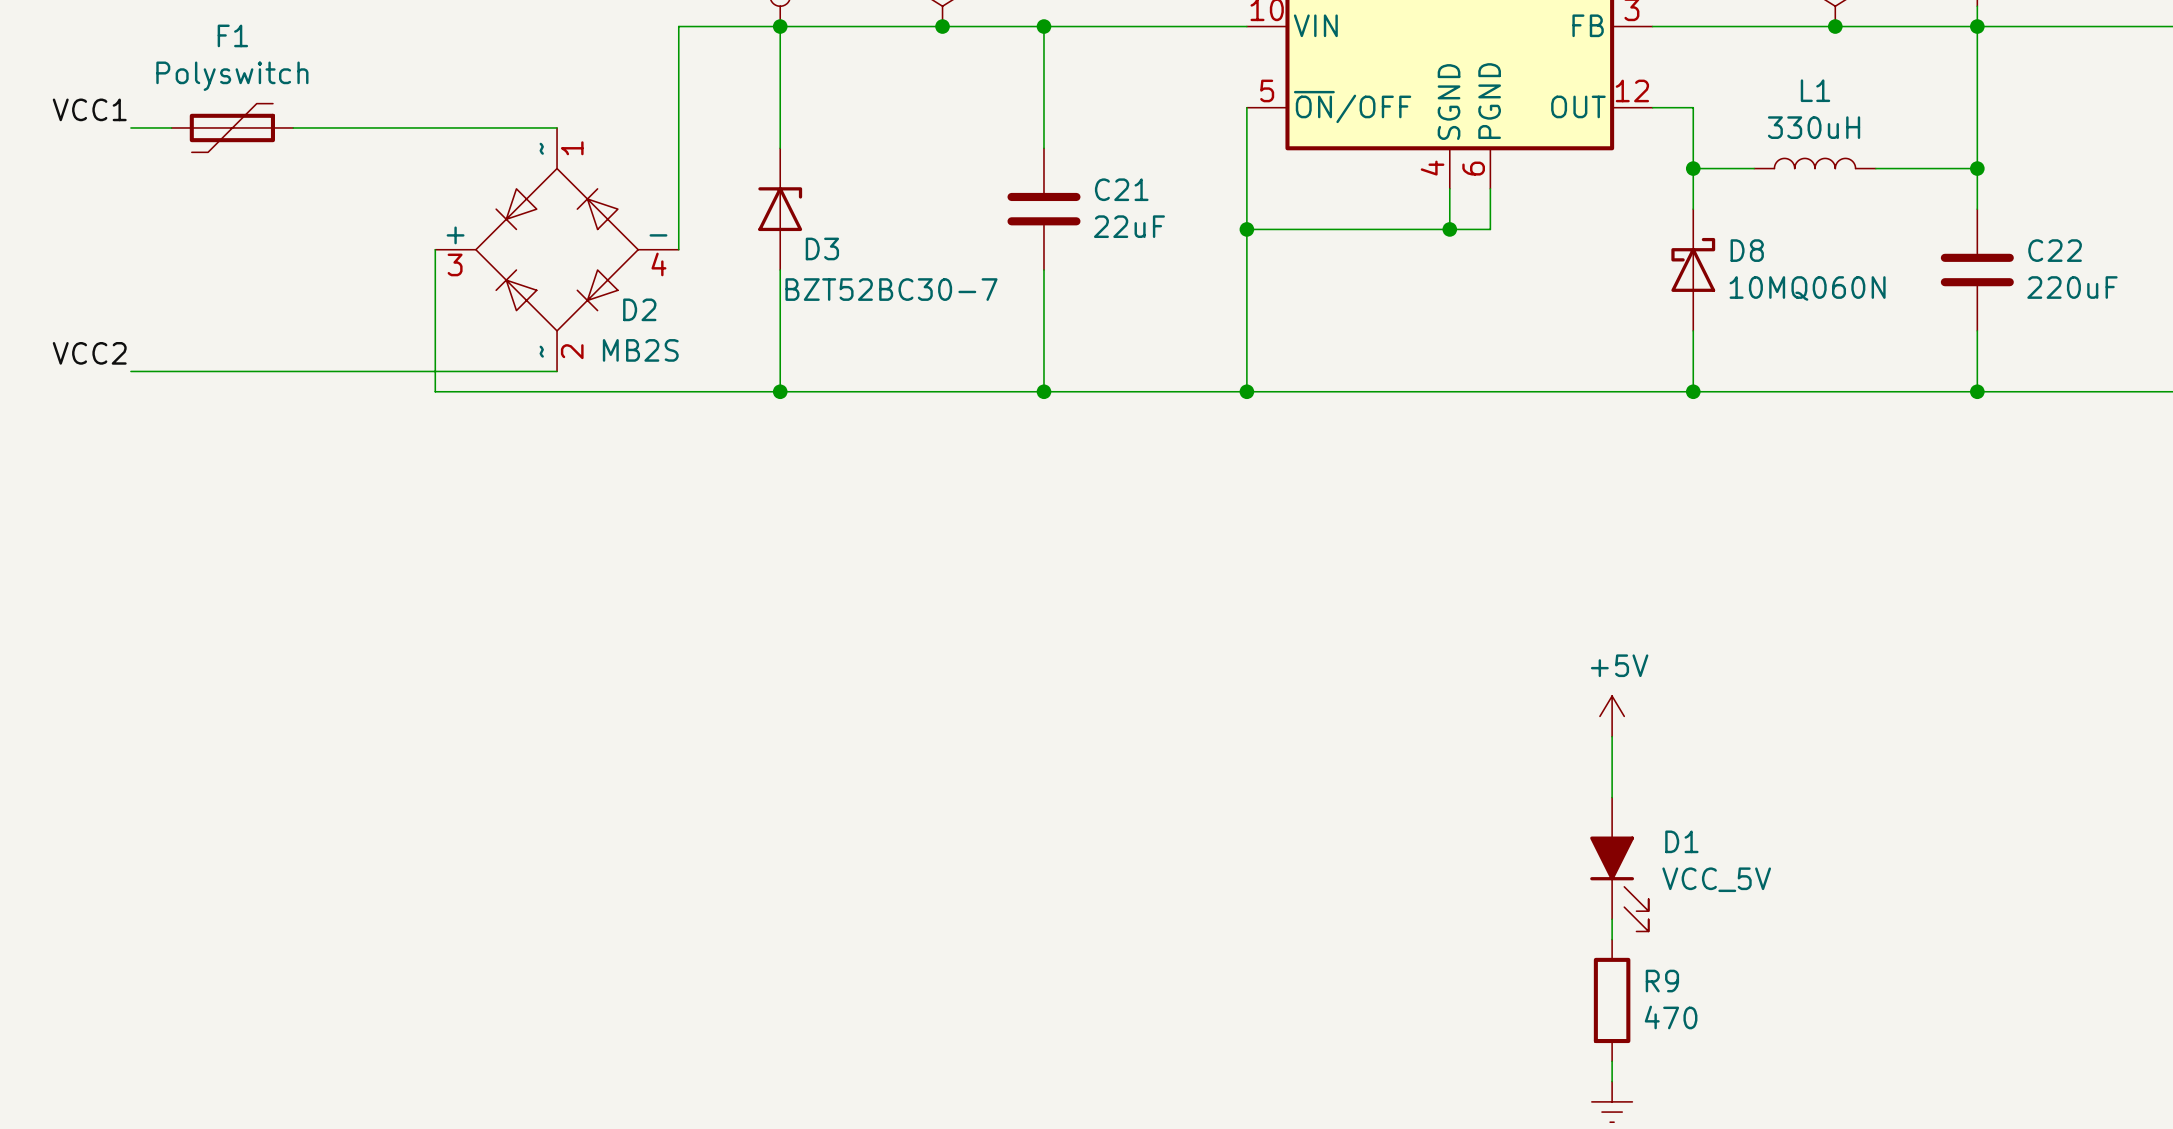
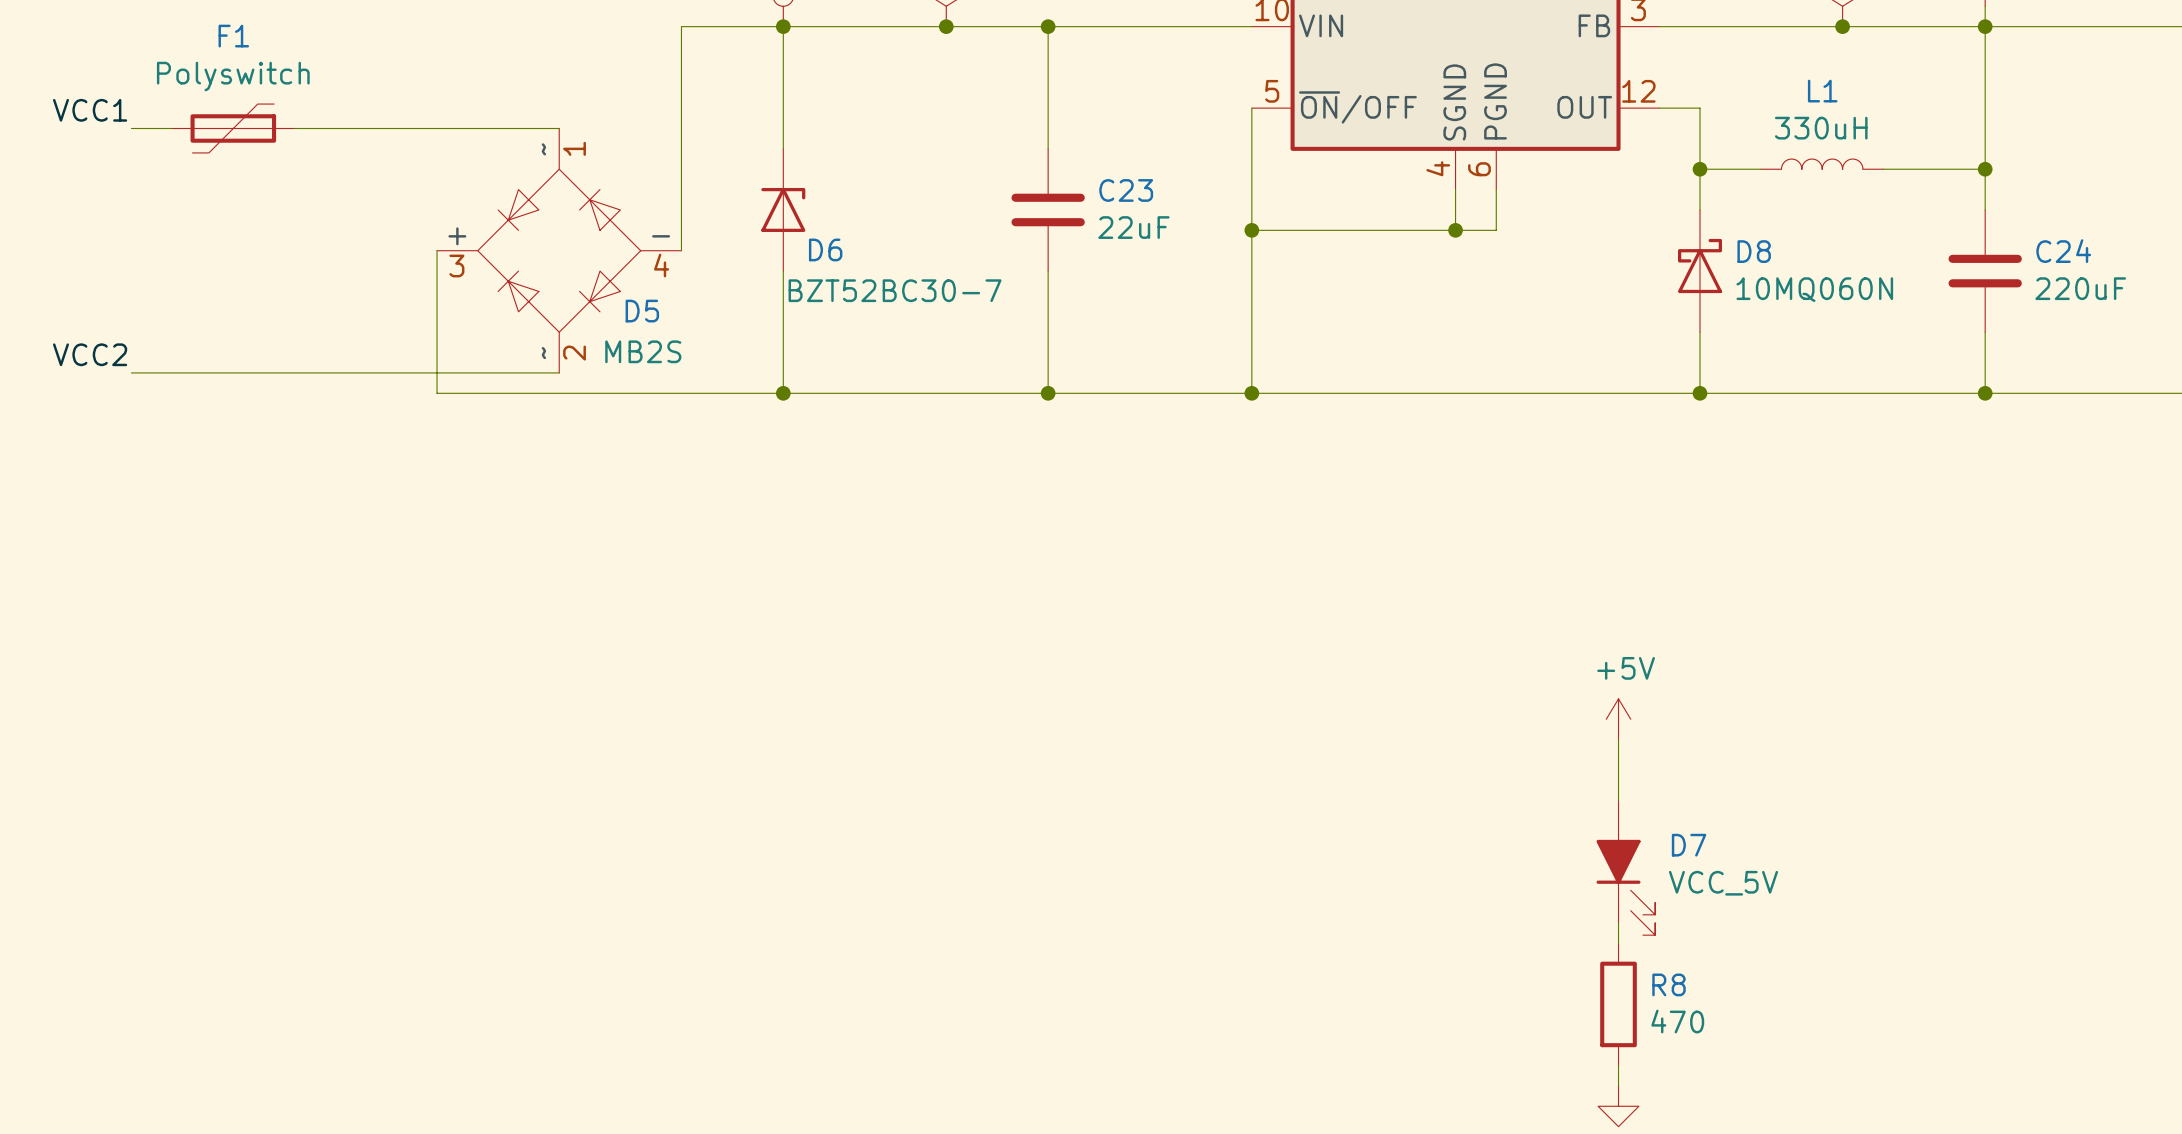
C21 name: C21 (1121, 189) -> C23 (1126, 190)
D3 name: D3 (822, 248) -> D6 (825, 249)
C22 name: C22 (2055, 250) -> C24 (2063, 251)
D2 name: D2 (639, 309) -> D5 (642, 311)
D1 name: D1 (1681, 841) -> D7 (1689, 845)
R9 name: R9 (1662, 981) -> R8 (1669, 984)
power symbol shape: [1591, 1081, 1633, 1123] -> [1598, 1085, 1639, 1127]

